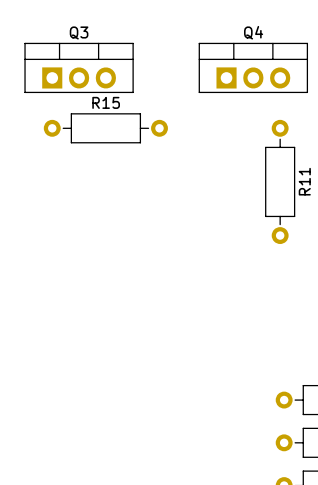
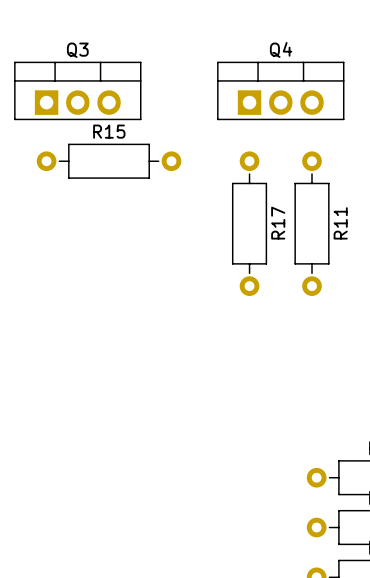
R17: none -> (249, 223)

